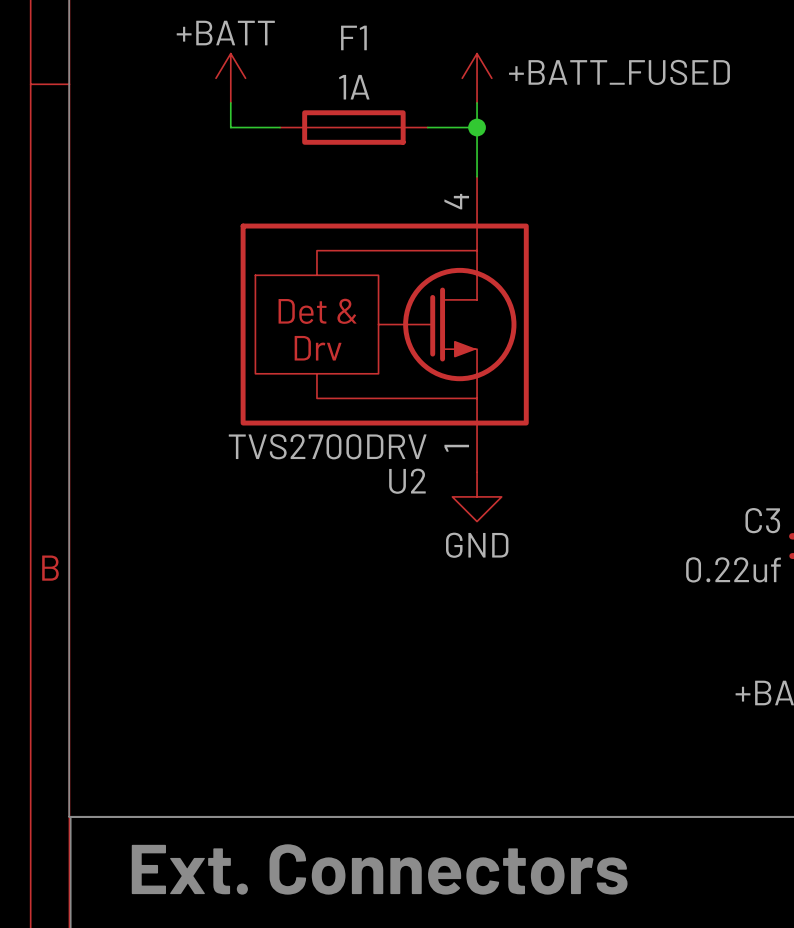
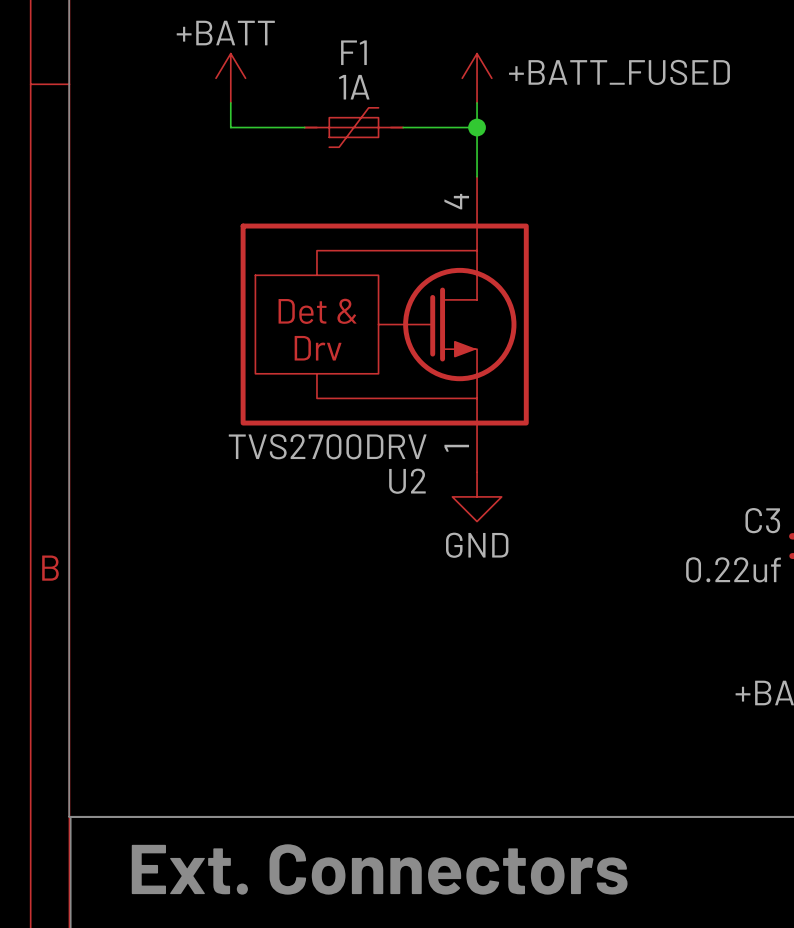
F1 symbol: [280, 110, 428, 145] -> [304, 107, 404, 148]

